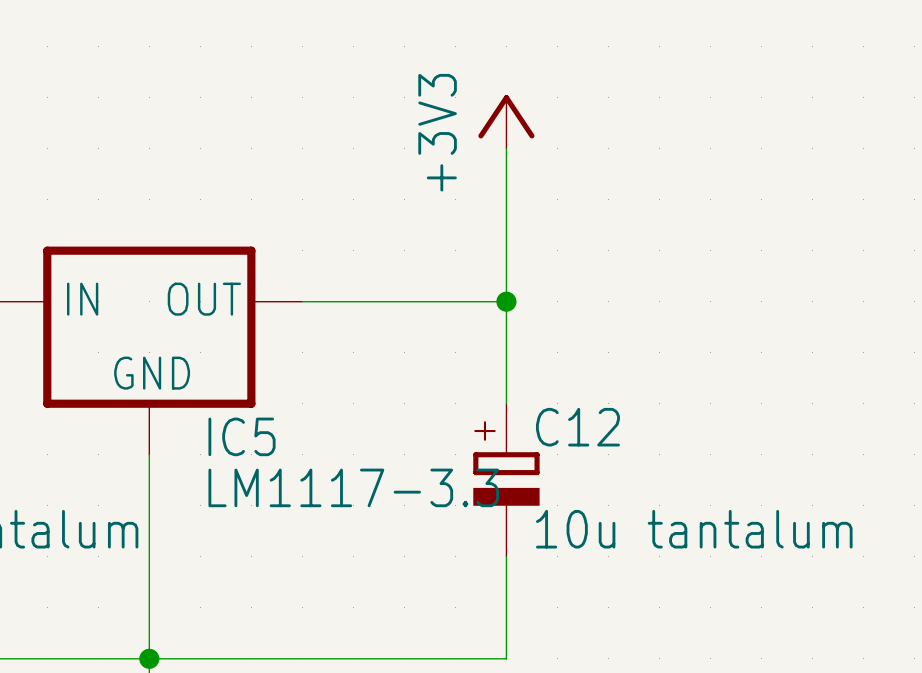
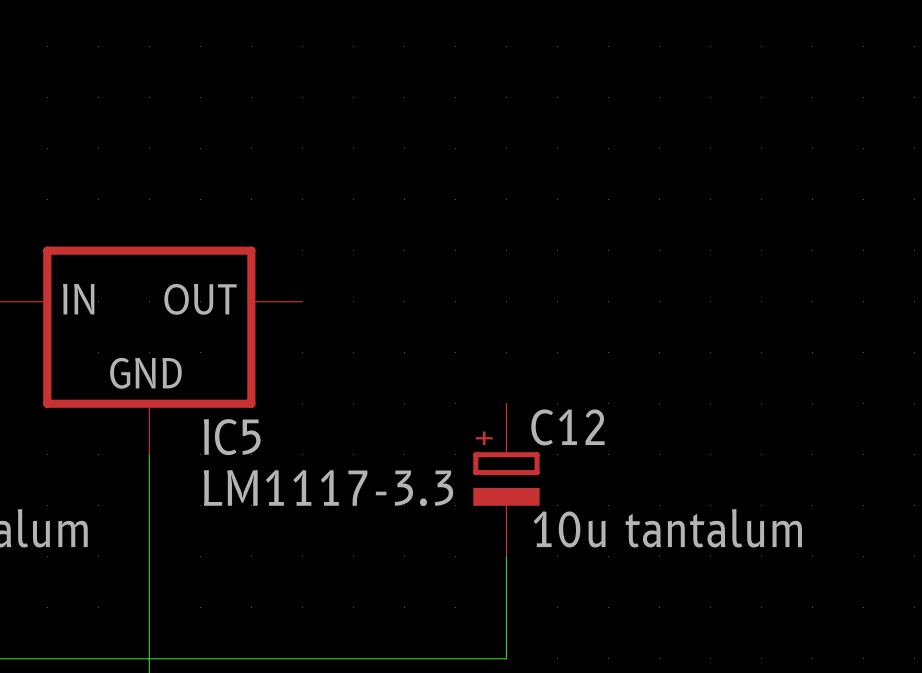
power symbol: +3V3 (506, 121) -> none
wire: (506, 148) (506, 403) -> none
wire: (302, 301) (506, 301) -> none
junction: (506, 301) -> none
junction: (149, 658) -> none

